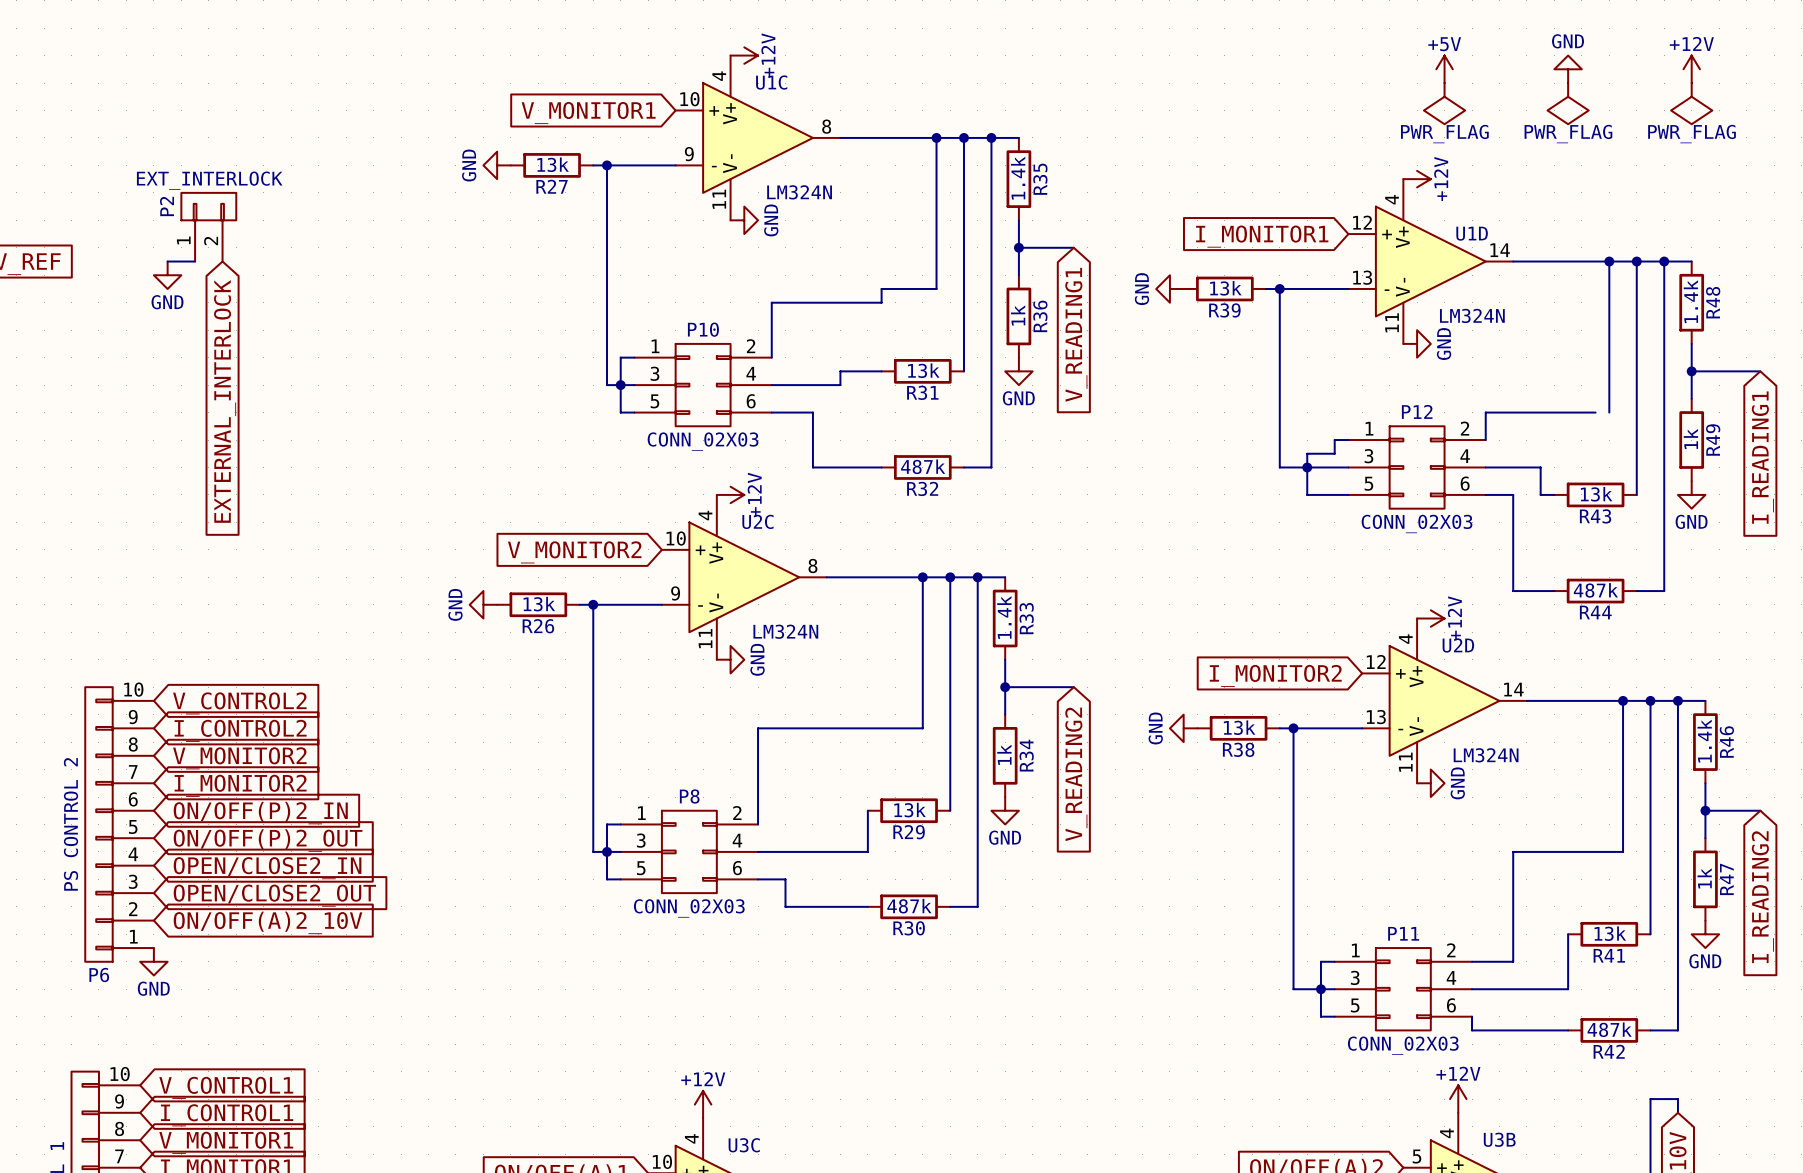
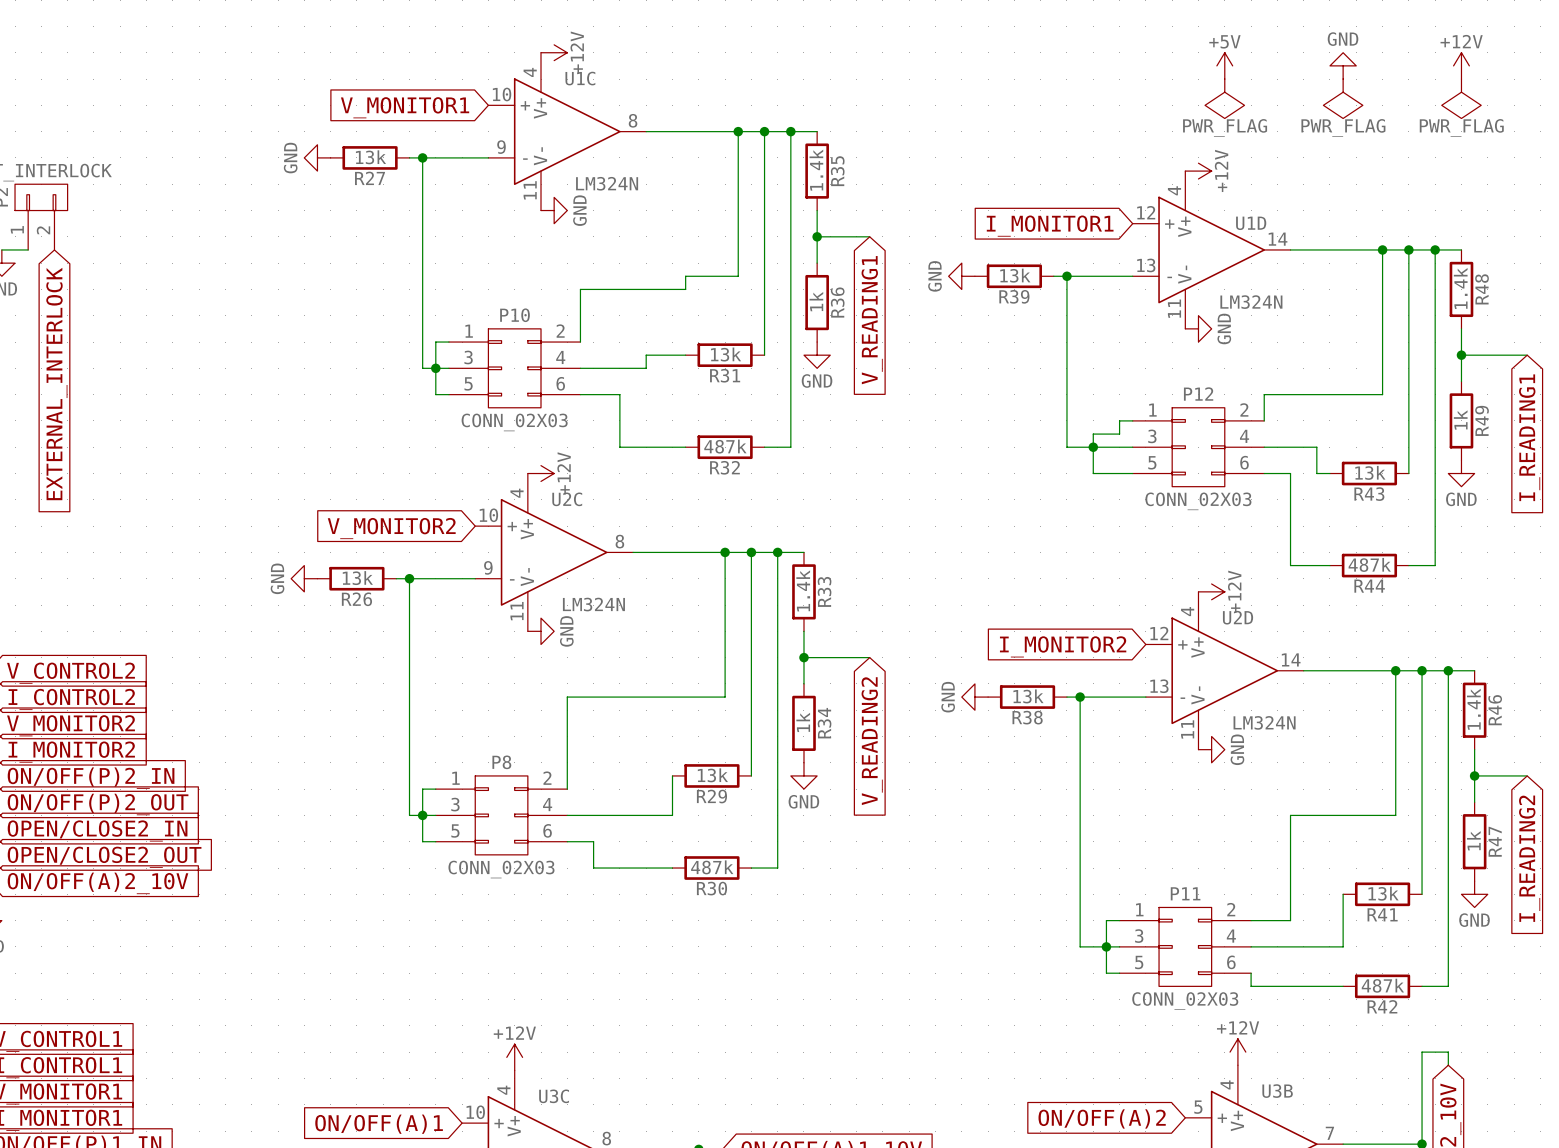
wire: none -> (1369, 394) (1382, 394)

